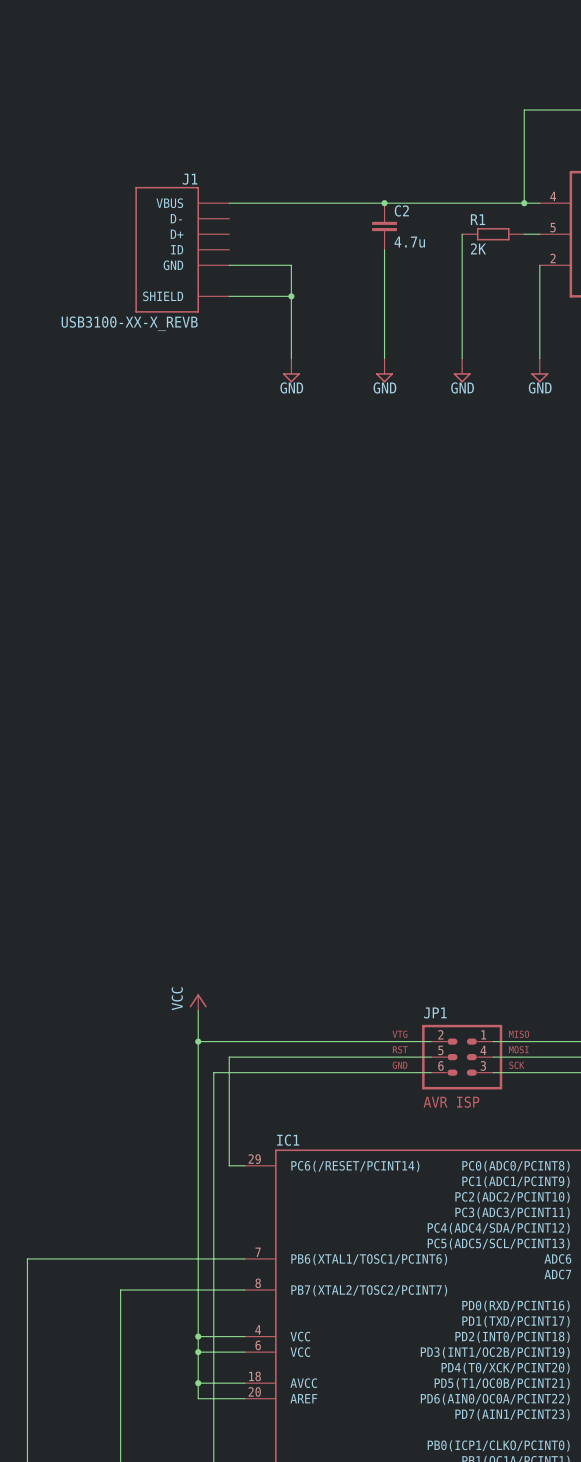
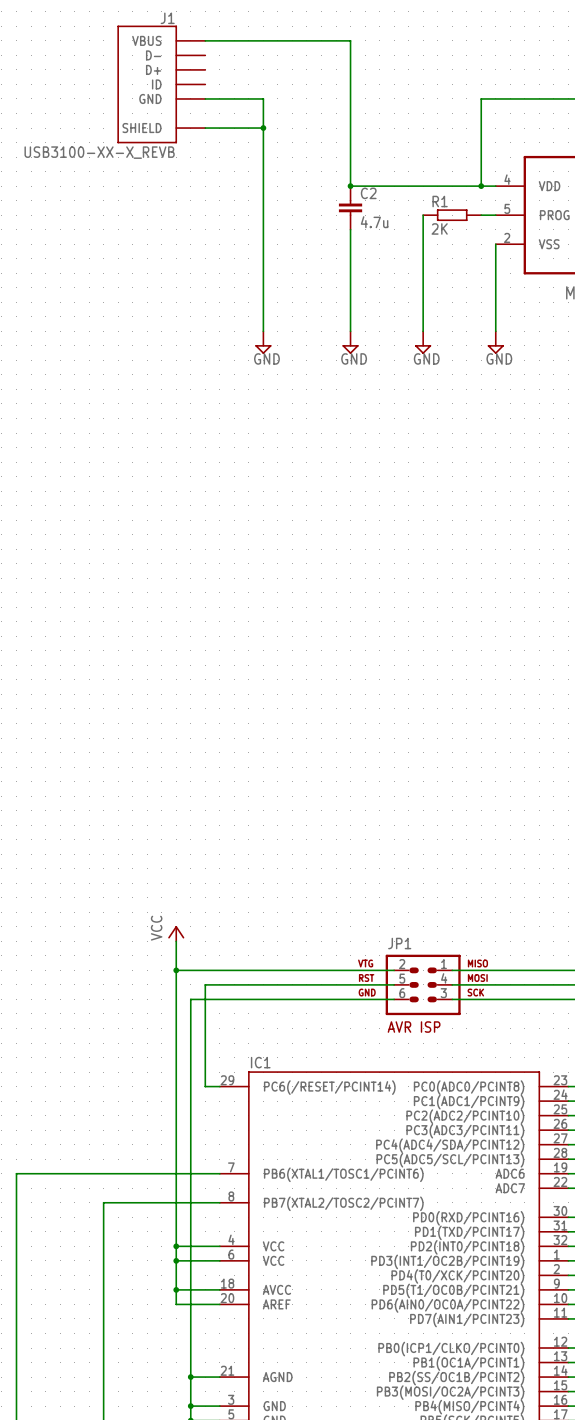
wire: none -> (205, 128) (263, 128)
junction: none -> (263, 128)
wire: (229, 203) (384, 203) -> (205, 40) (350, 40) (350, 186)
J1 position: (182, 249) -> (161, 84)
wire: (229, 265) (291, 265) -> (205, 98) (263, 98) (263, 244)
wire: (229, 296) (291, 296) -> none
junction: (291, 296) -> none

